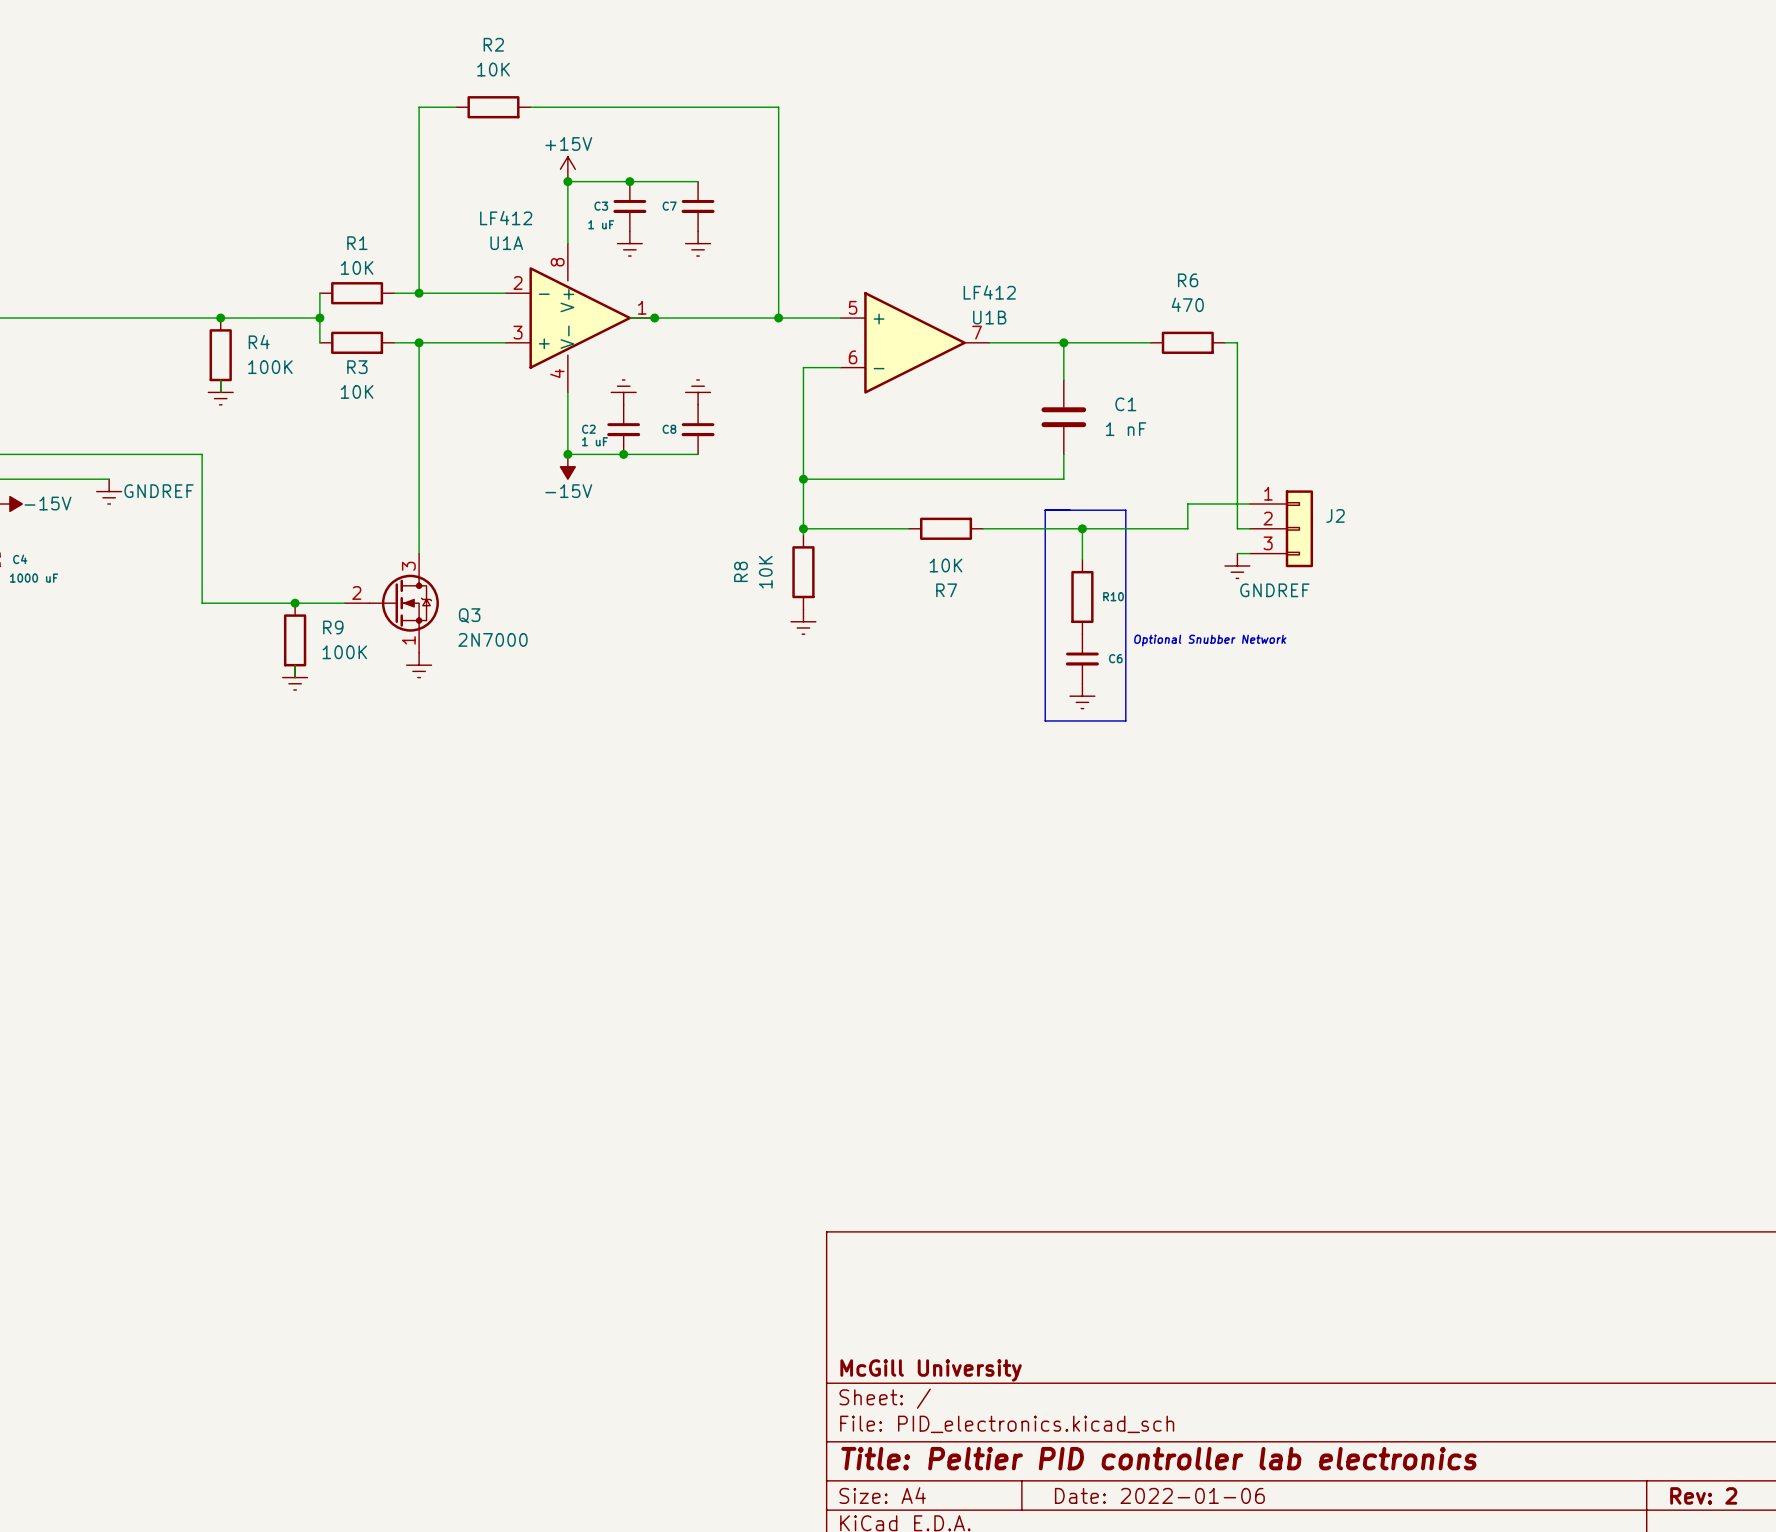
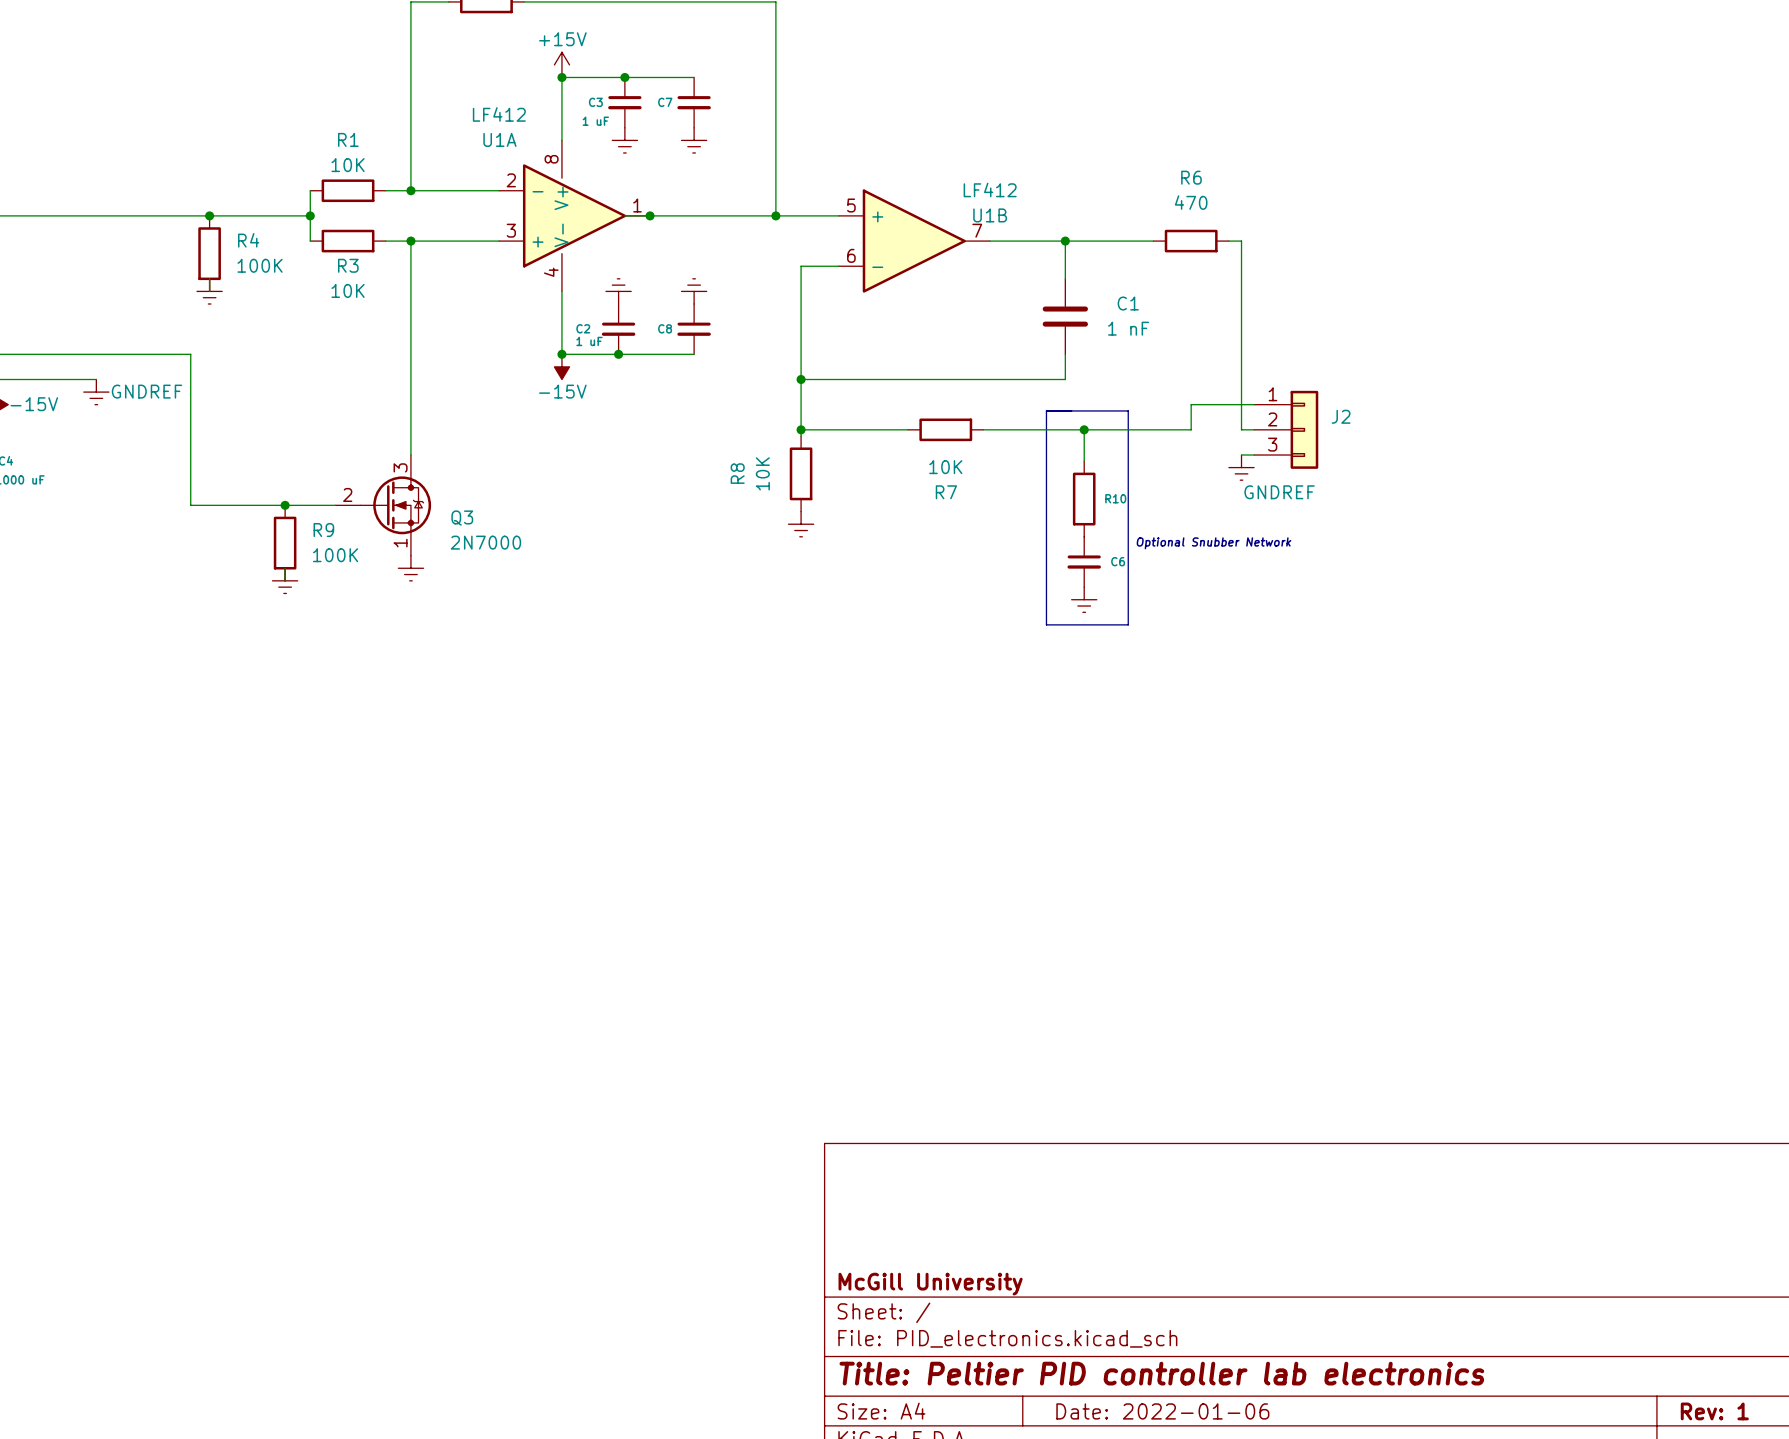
title block: Rev: 2 (1703, 1495) -> Rev: 1 (1714, 1411)

